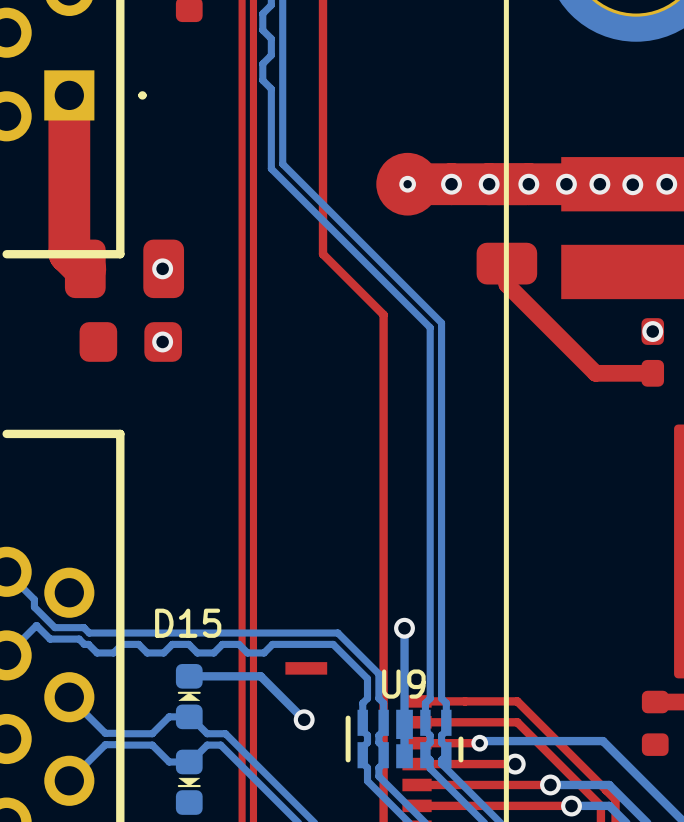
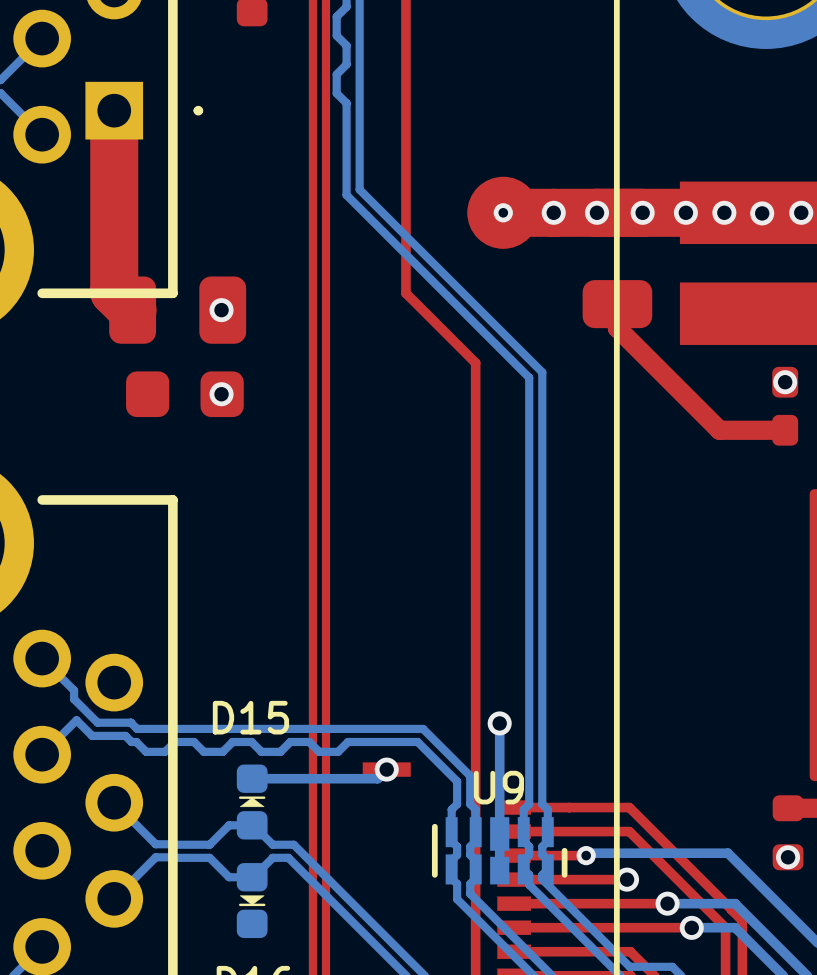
bottom track: (260, 676) (304, 719) -> (334, 778) (377, 778) (386, 769)
via position: (304, 719) -> (386, 769)
via: none -> (788, 857)

